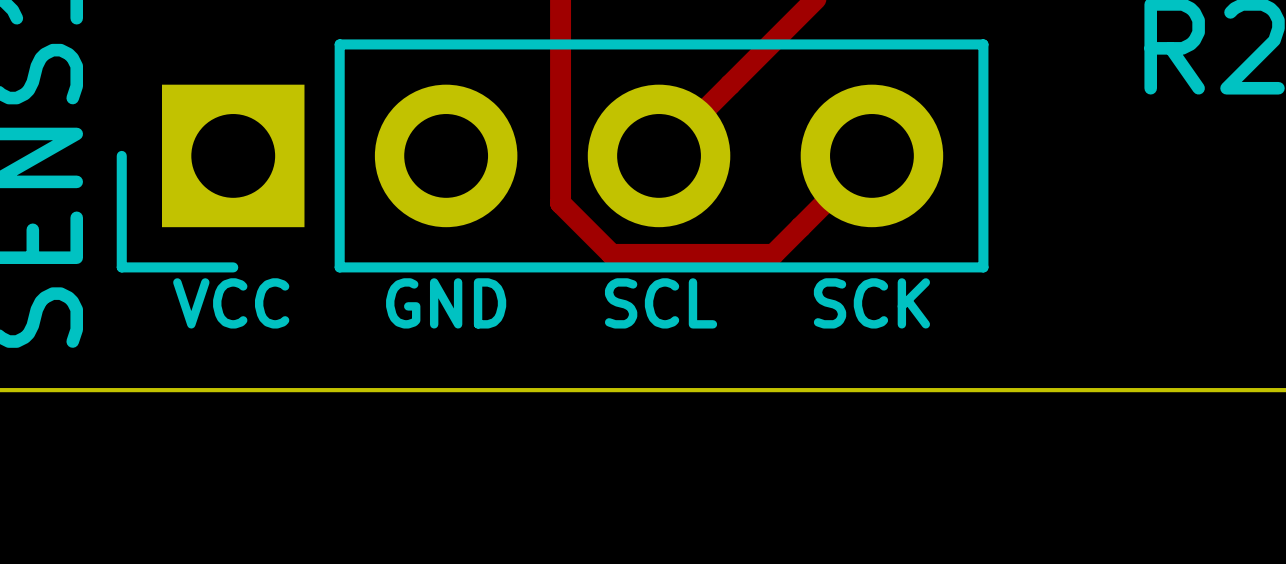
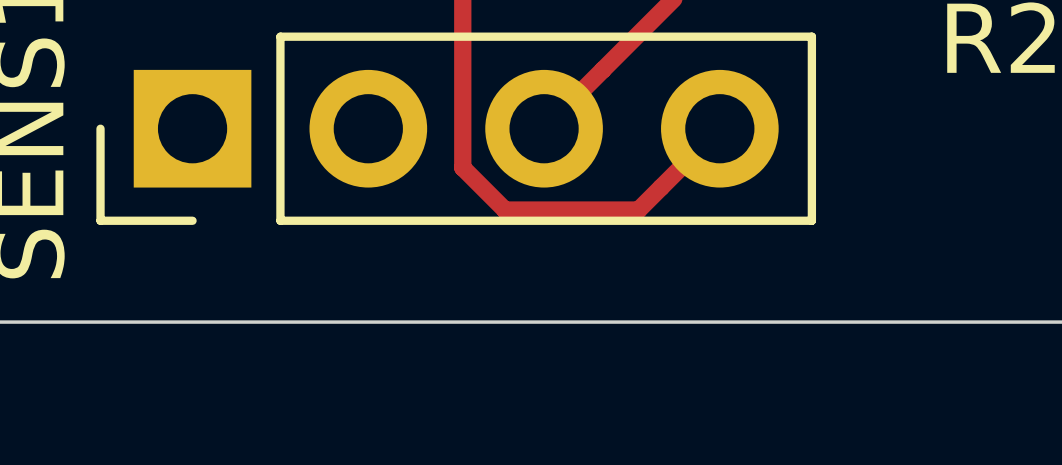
text: VCC (231, 303) -> none
text: GND (446, 303) -> none
text: SCL (661, 303) -> none
text: SCK (871, 303) -> none

